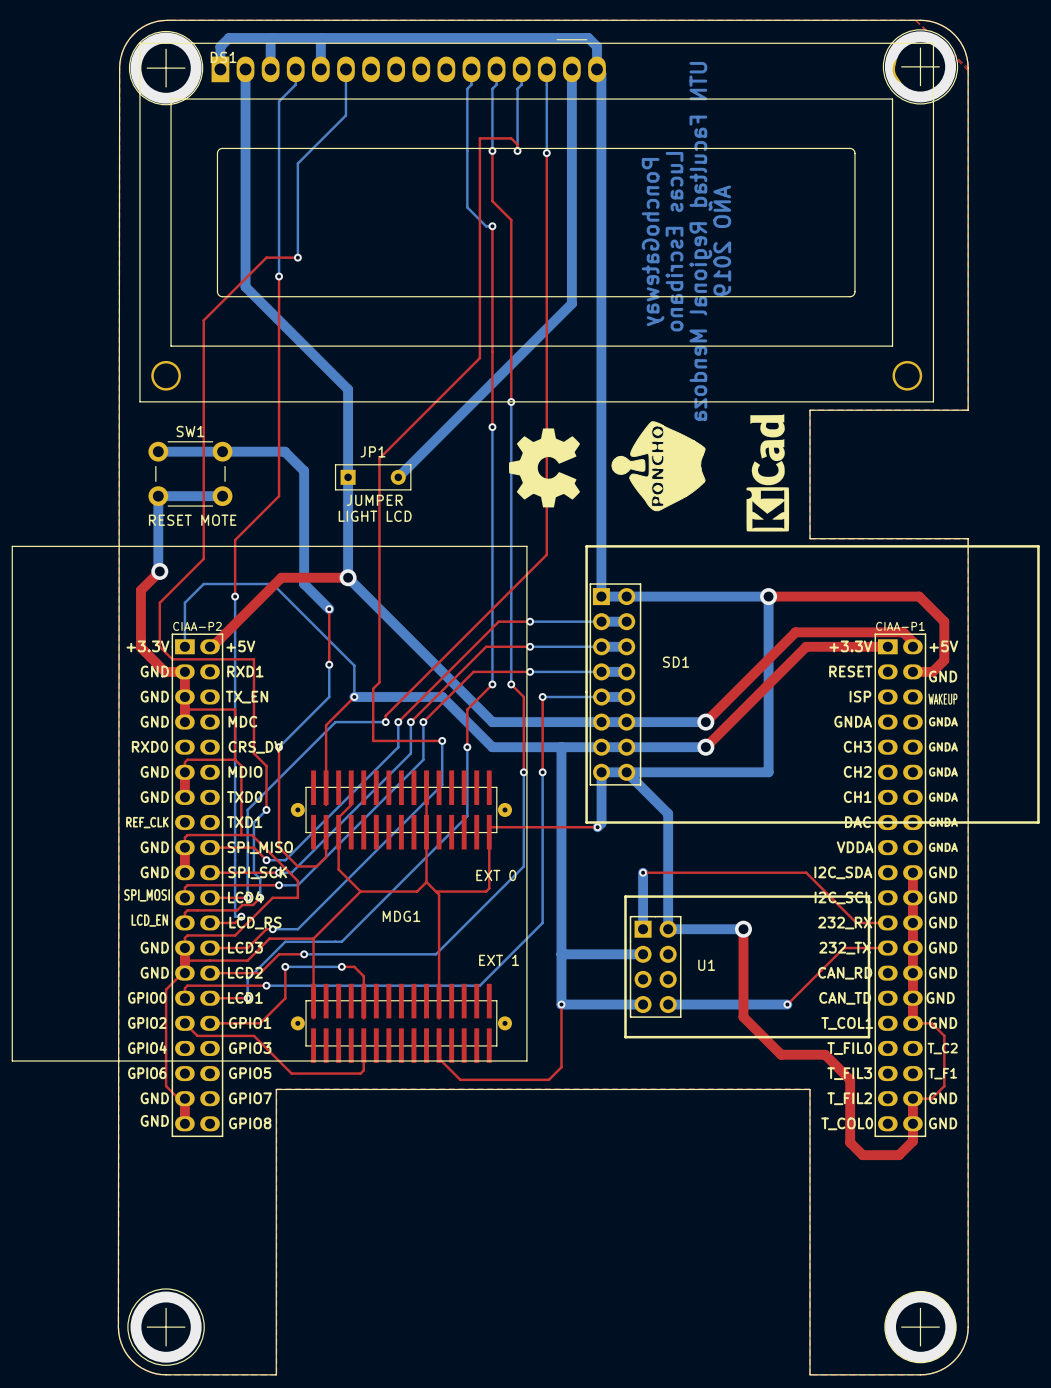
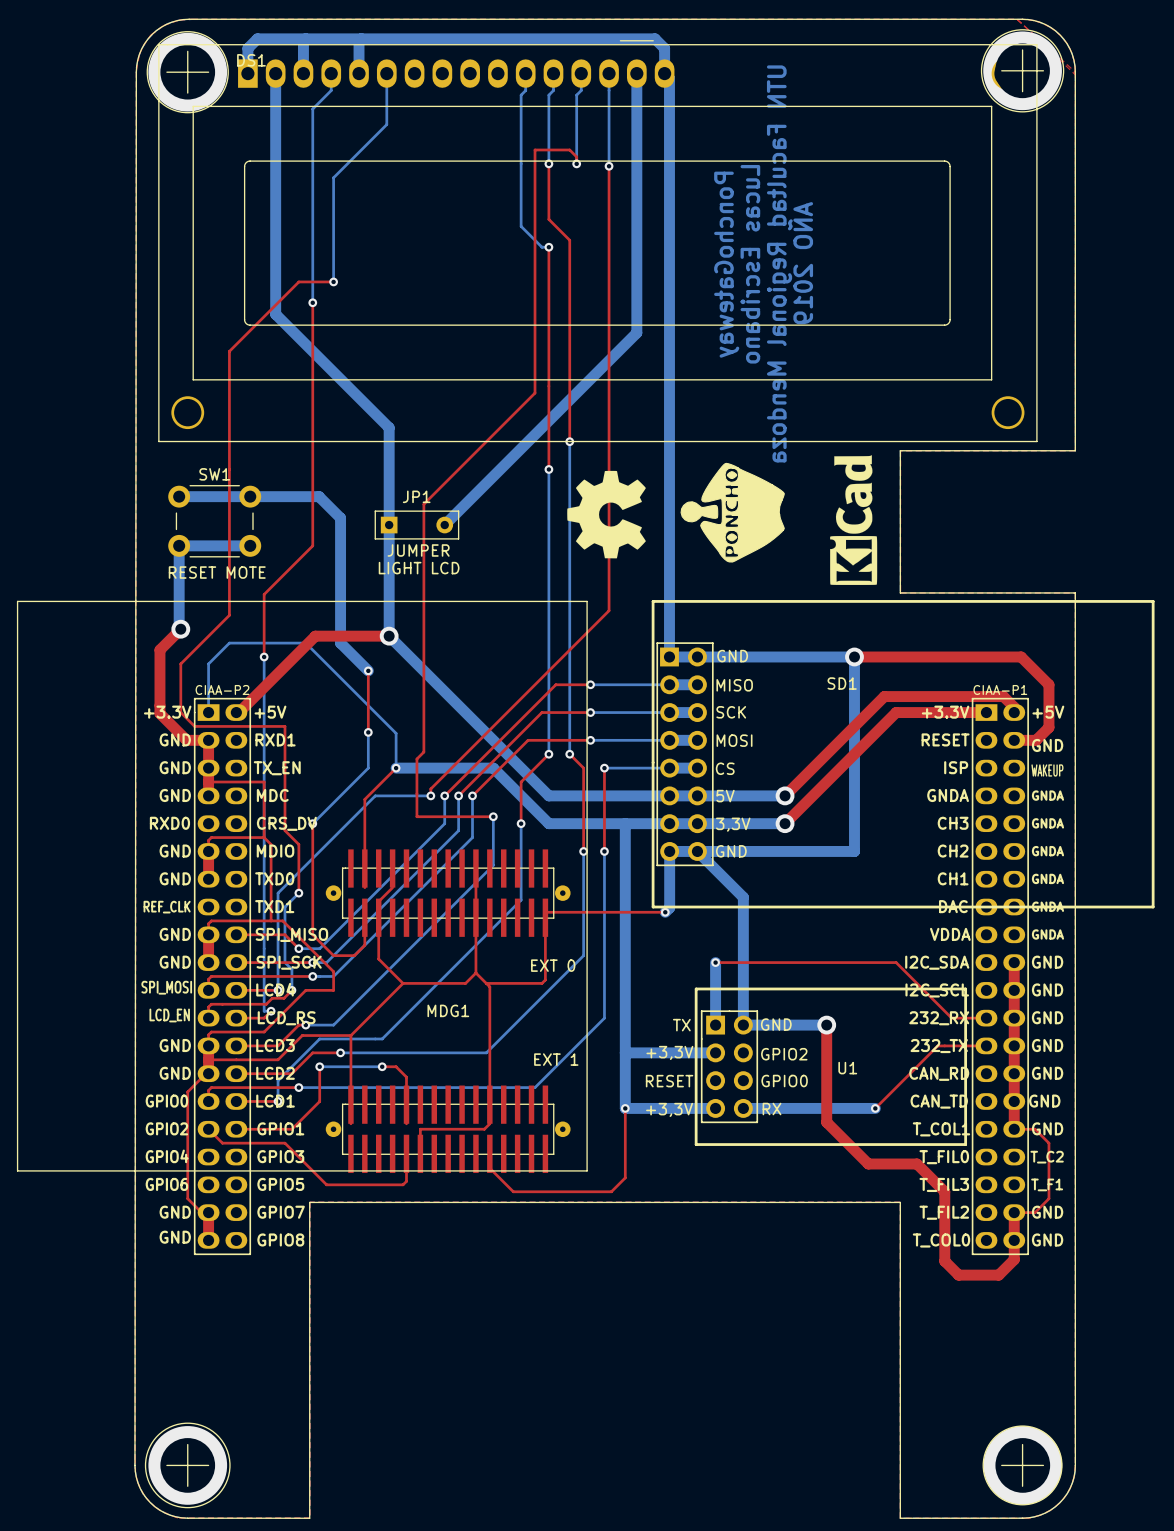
text: none -> GND (732, 656)
text: none -> MISO (734, 685)
text: none -> SCK (731, 712)
SD1 name position: SD1 (676, 662) -> SD1 (842, 683)
text: none -> MOSI (734, 740)
text: none -> CS (725, 768)
text: none -> 5V (725, 796)
text: none -> 3,3V (733, 824)
text: none -> GND (731, 851)
text: none -> GND (776, 1024)
text: none -> TX (681, 1025)
text: none -> +3,3V (669, 1052)
text: none -> GPIO2 (784, 1054)
U1 name position: U1 (706, 965) -> U1 (847, 1068)
text: none -> RESET (669, 1081)
text: none -> GPIO0 (784, 1081)
text: none -> +3,3V (669, 1109)
text: none -> RX (772, 1109)
top track: none -> (489, 1123) (484, 1129) (420, 1129) (420, 1148)

